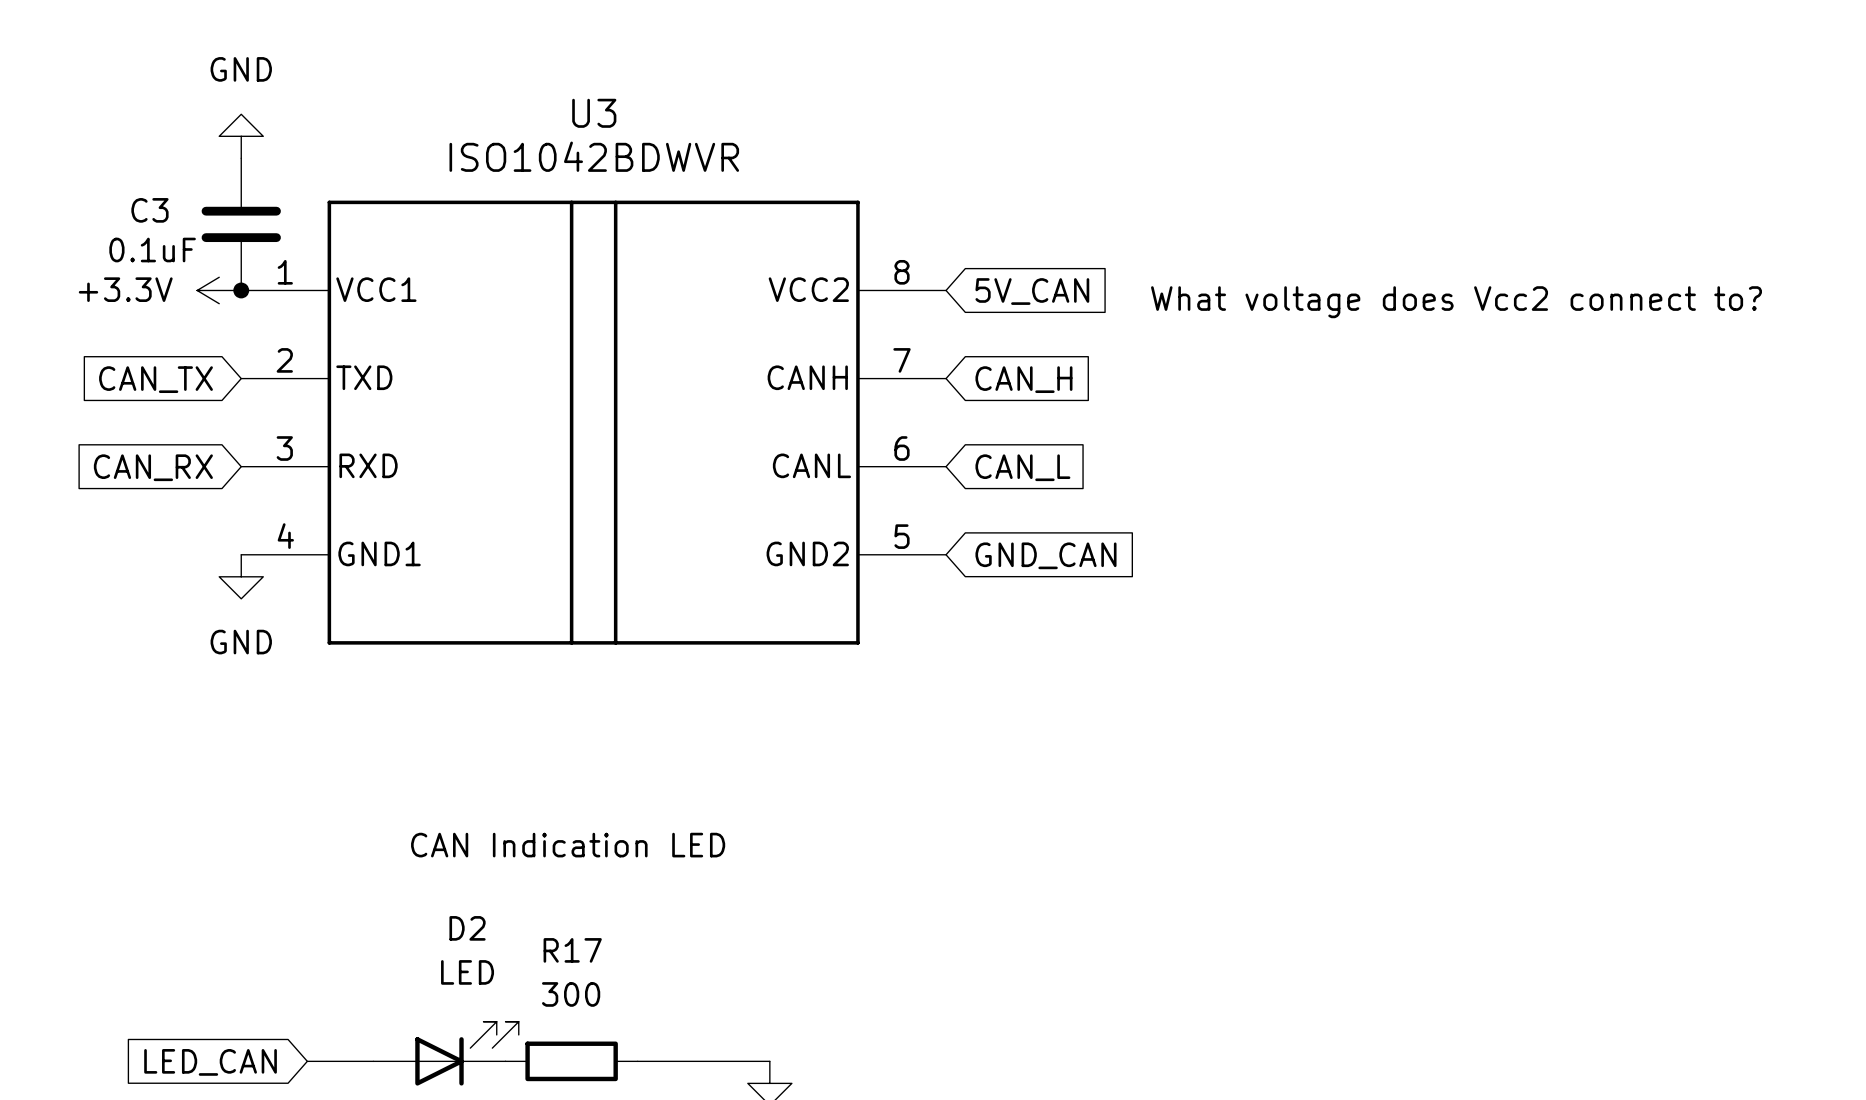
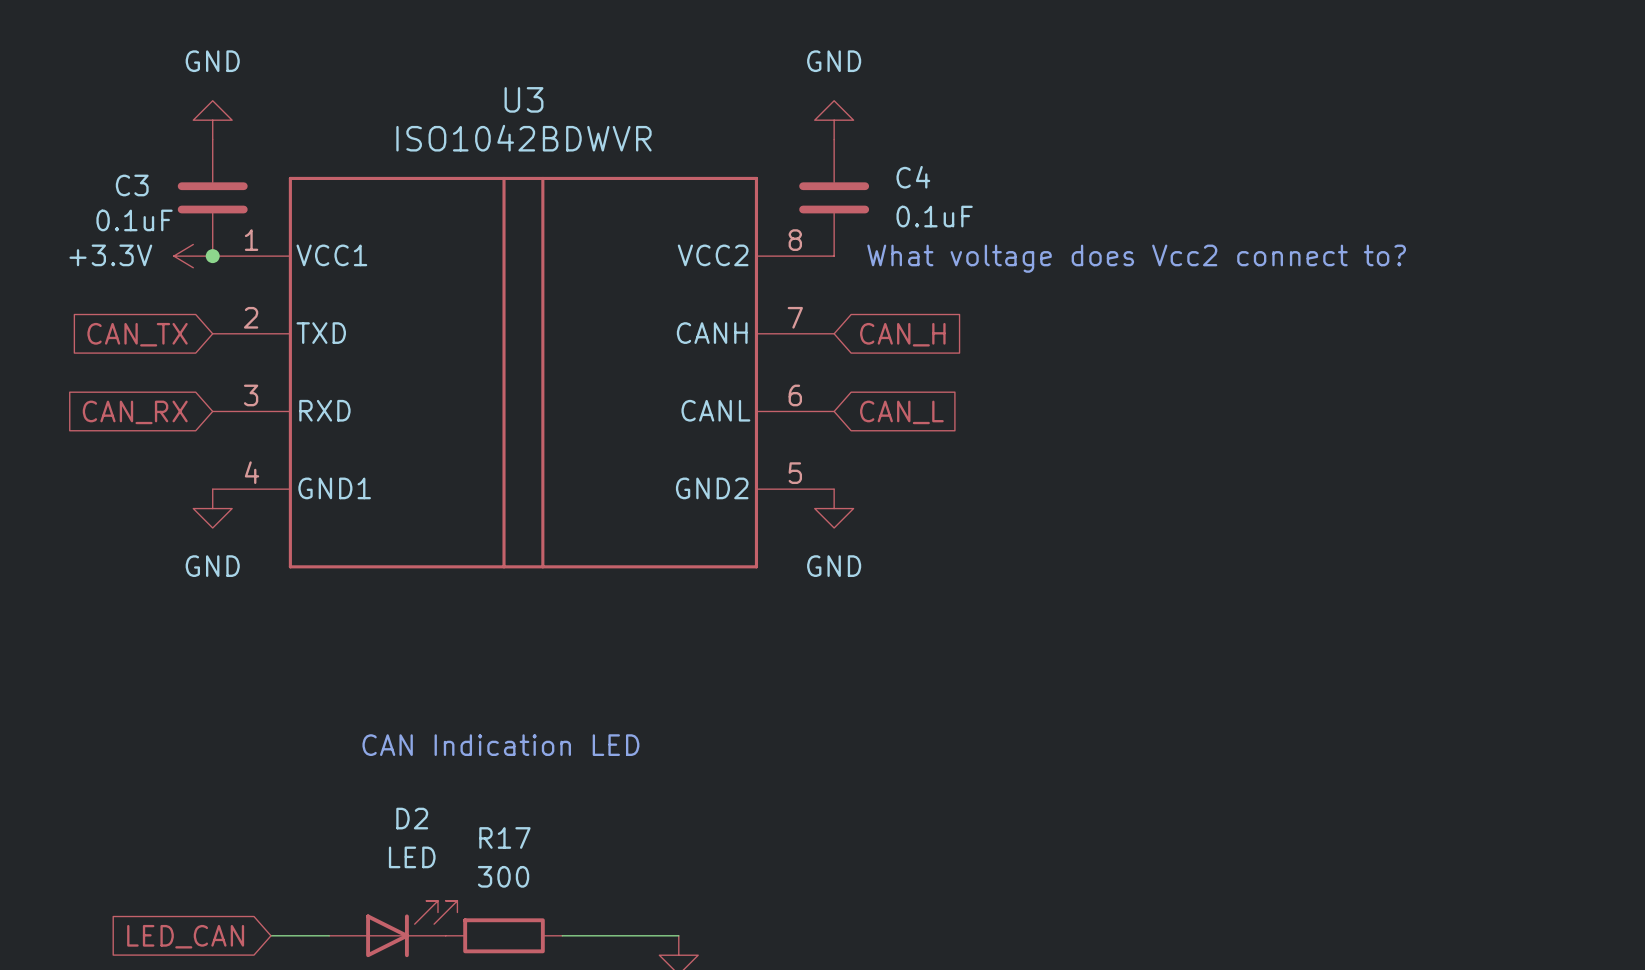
power symbol: none -> GND (834, 120)
C4: none -> 0.1uF (834, 197)
global label: 5V_CAN (1032, 291) -> none
text position: What voltage does Vcc2 connect to? (1456, 302) -> What voltage does Vcc2 connect to? (1136, 258)
global label: GND_CAN (1045, 555) -> none
power symbol: none -> GND (834, 508)

